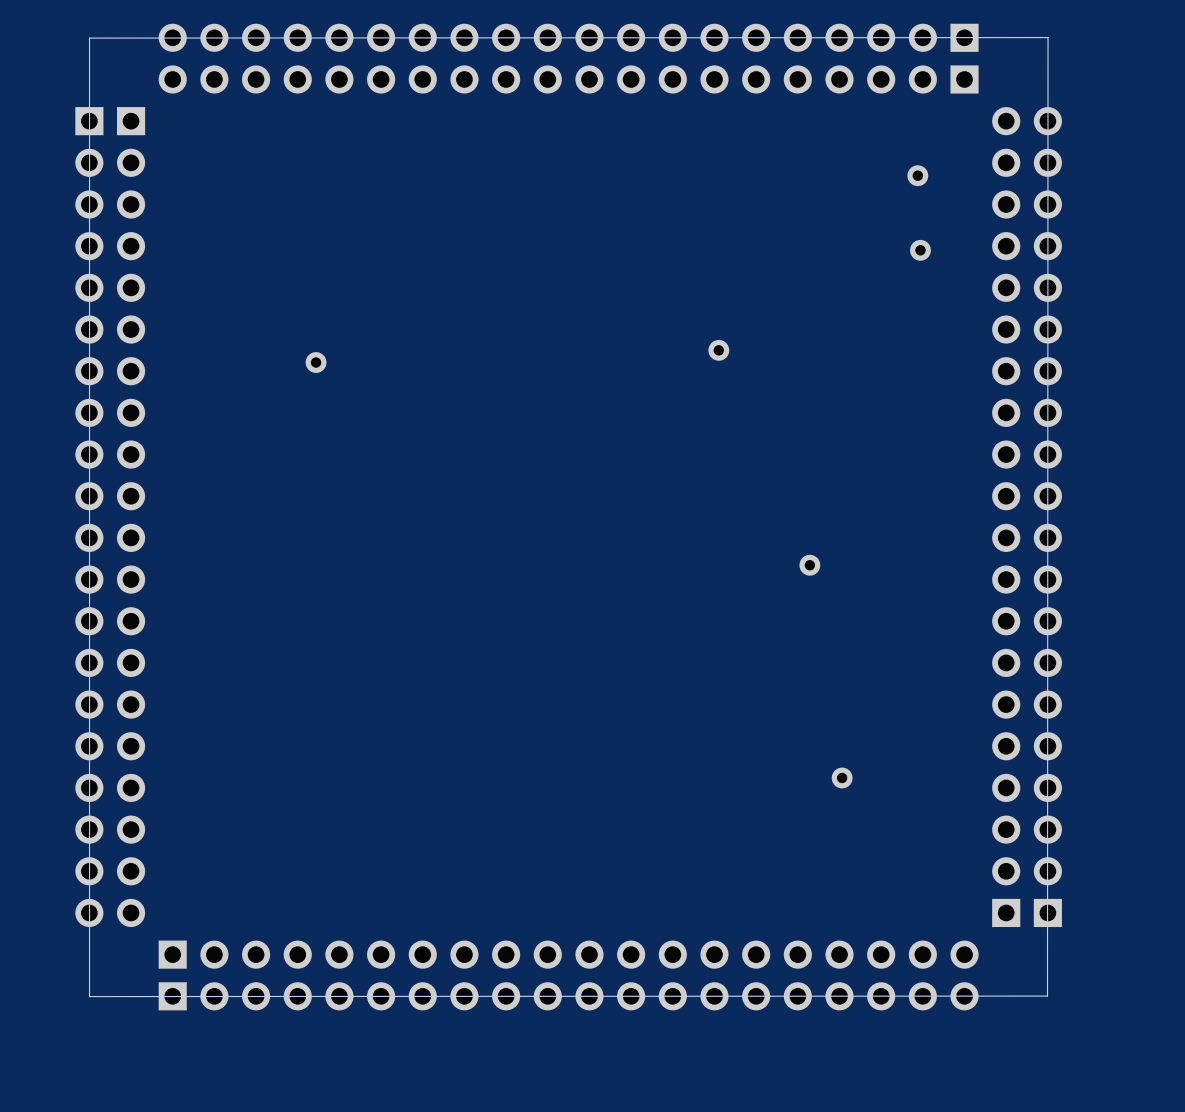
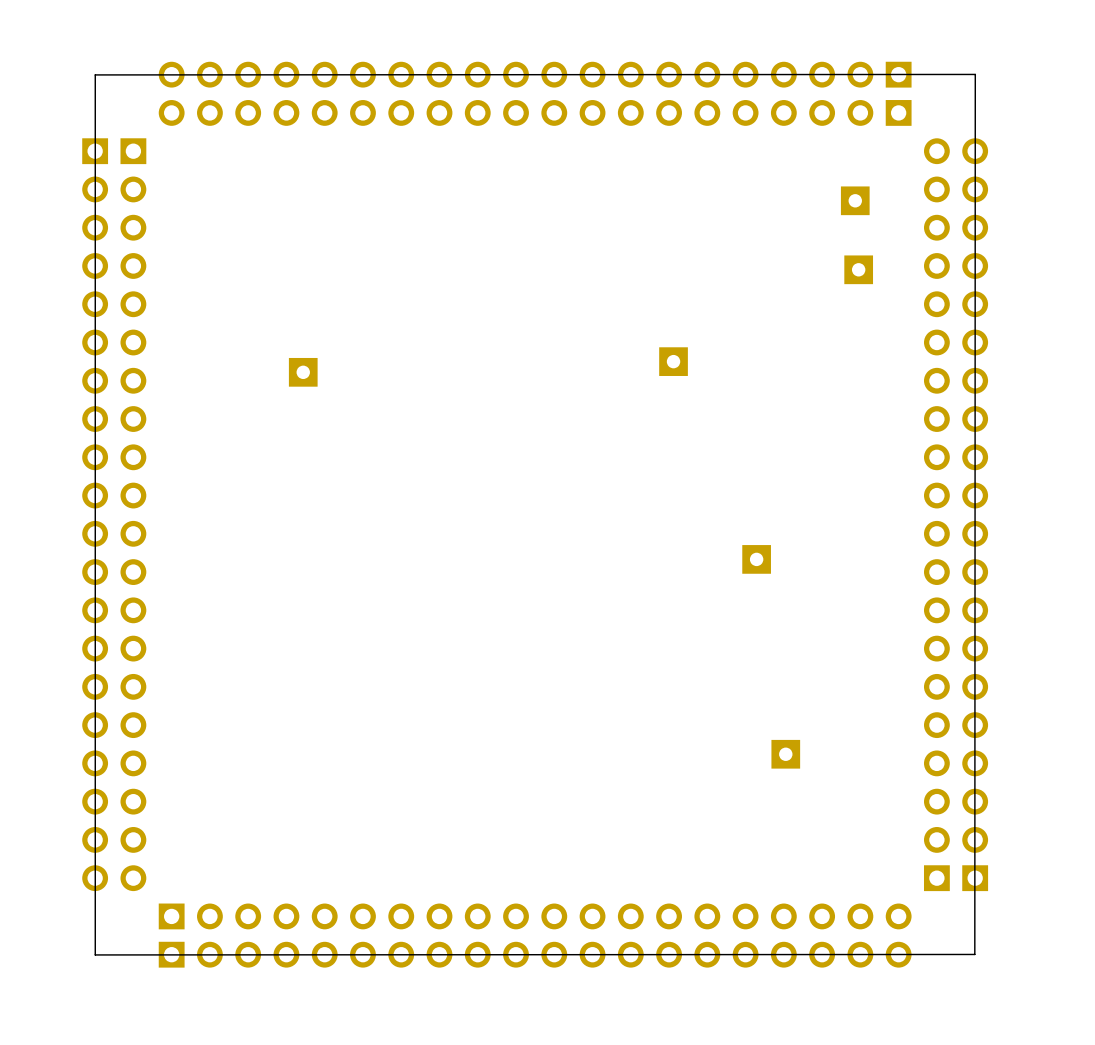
part footprint: [907, 165, 929, 187] -> [840, 186, 870, 216]
part footprint: [910, 239, 931, 261] -> [844, 255, 874, 285]
part footprint: [708, 339, 730, 361] -> [659, 347, 688, 376]
part footprint: [305, 352, 327, 373] -> [288, 357, 318, 387]
part footprint: [799, 554, 821, 576] -> [742, 545, 771, 574]
part footprint: [831, 767, 853, 789] -> [771, 739, 801, 769]

